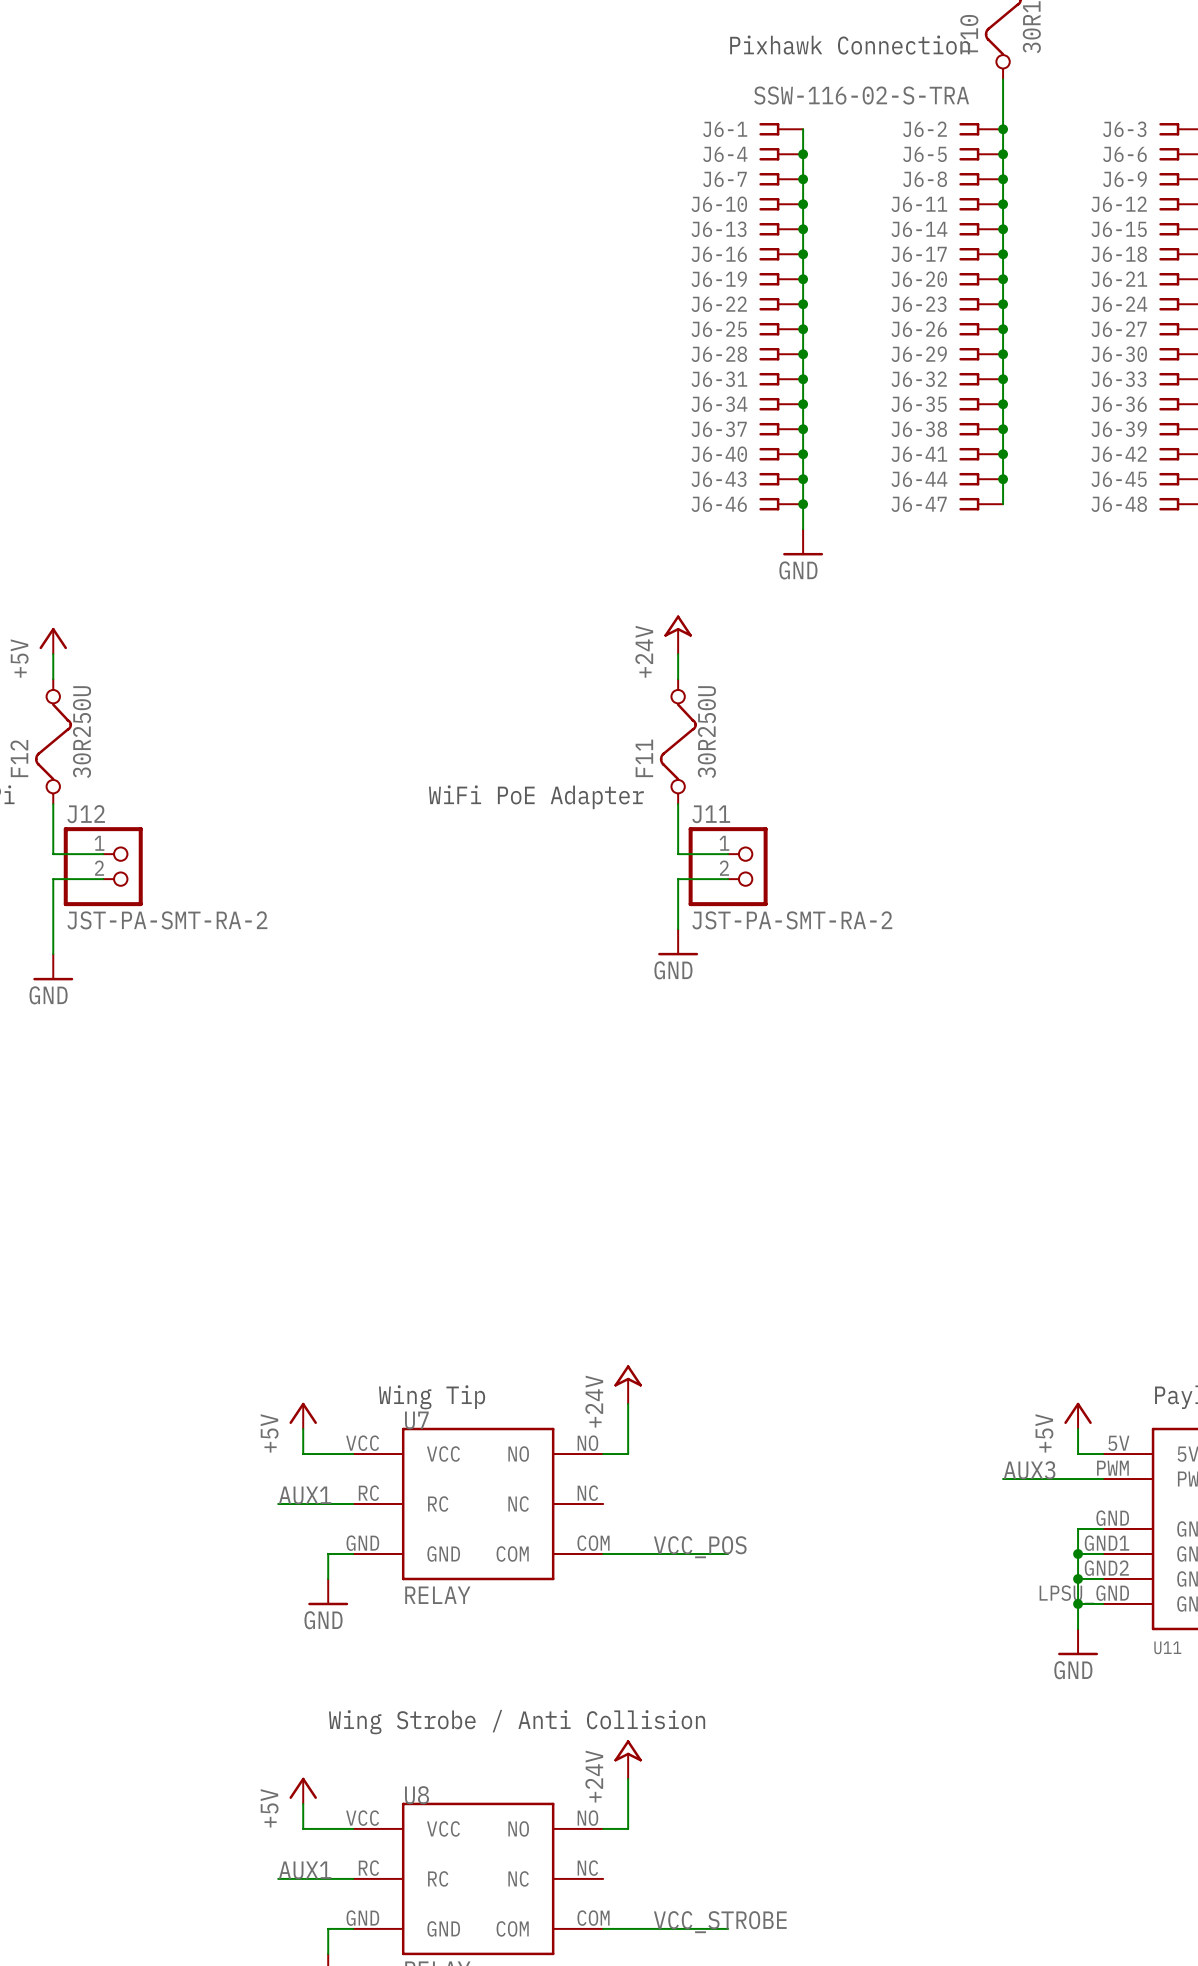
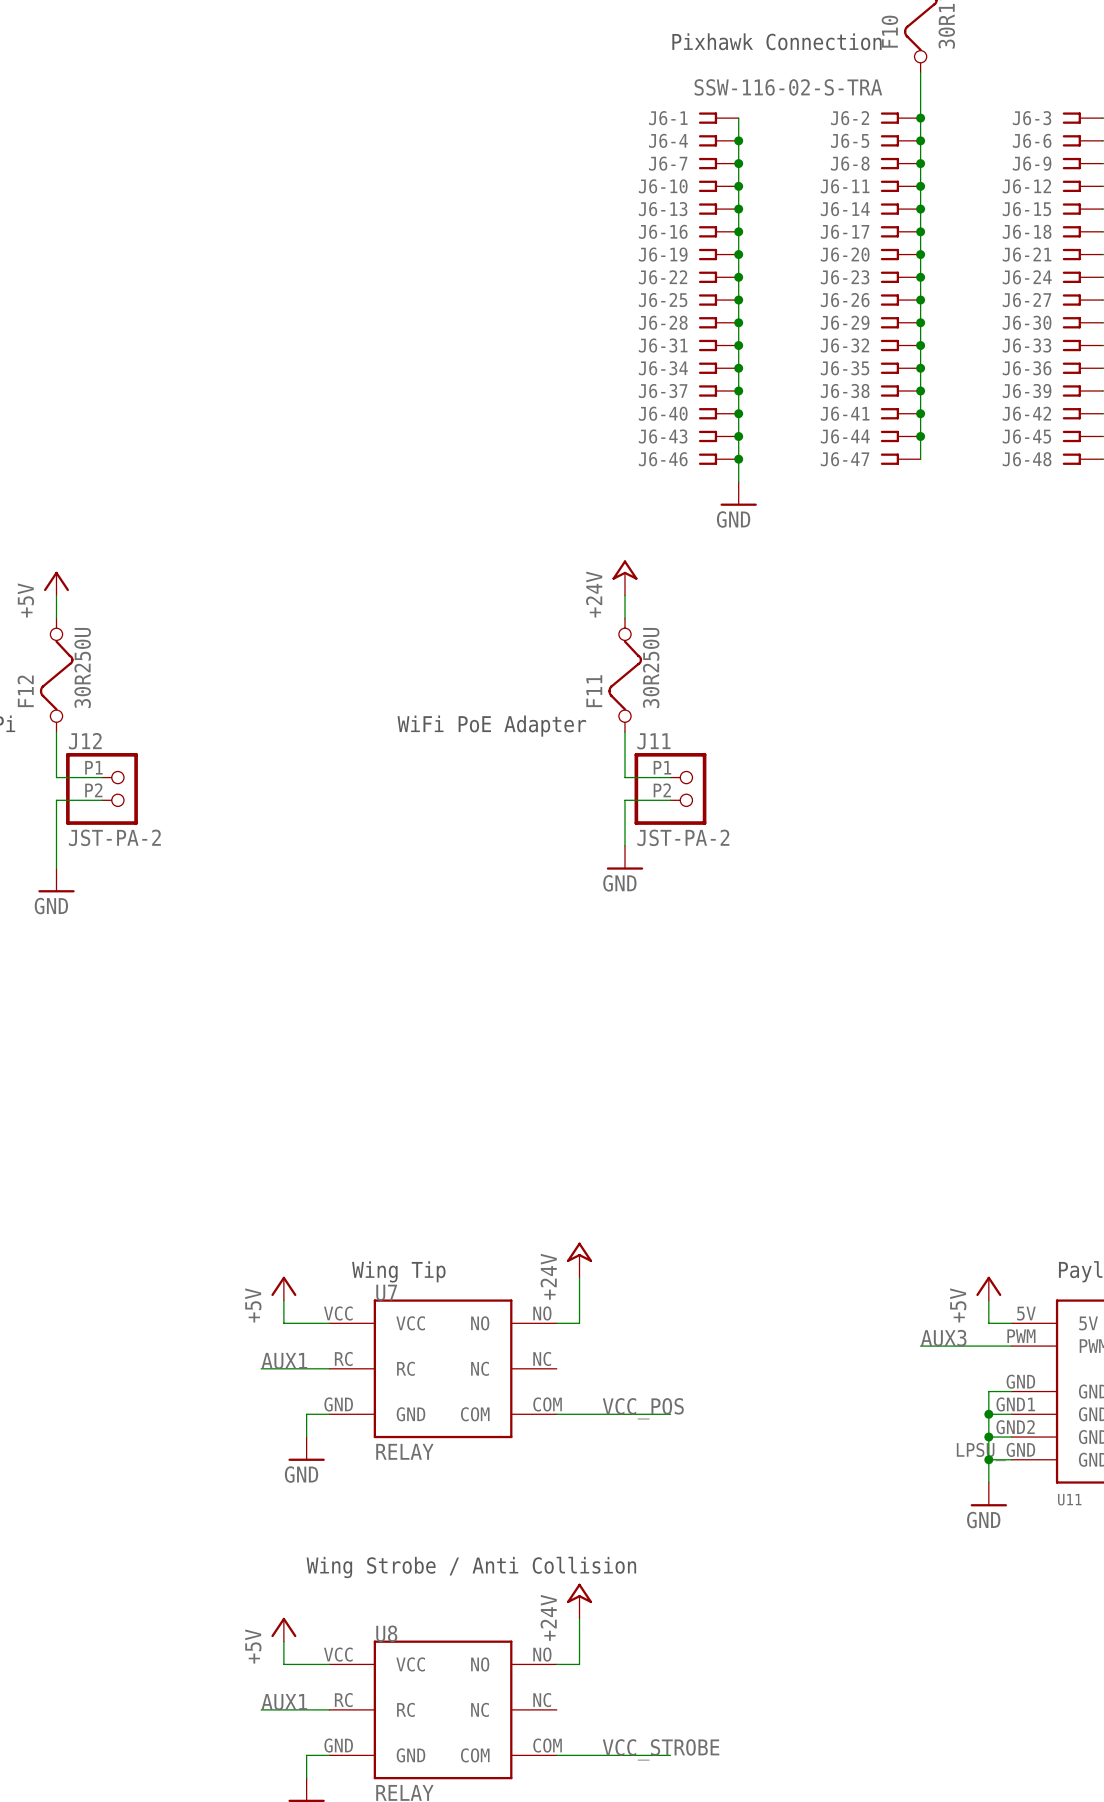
J12 pin number: 1 (99, 843) -> P1 (93, 767)
J11 pin number: 1 (724, 843) -> P1 (662, 767)
J12 pin number: 2 (99, 868) -> P2 (93, 790)
J11 pin number: 2 (724, 868) -> P2 (662, 790)
J12 value: JST-PA-SMT-RA-2 (167, 920) -> JST-PA-2 (114, 837)
J11 value: JST-PA-SMT-RA-2 (792, 920) -> JST-PA-2 (683, 837)

